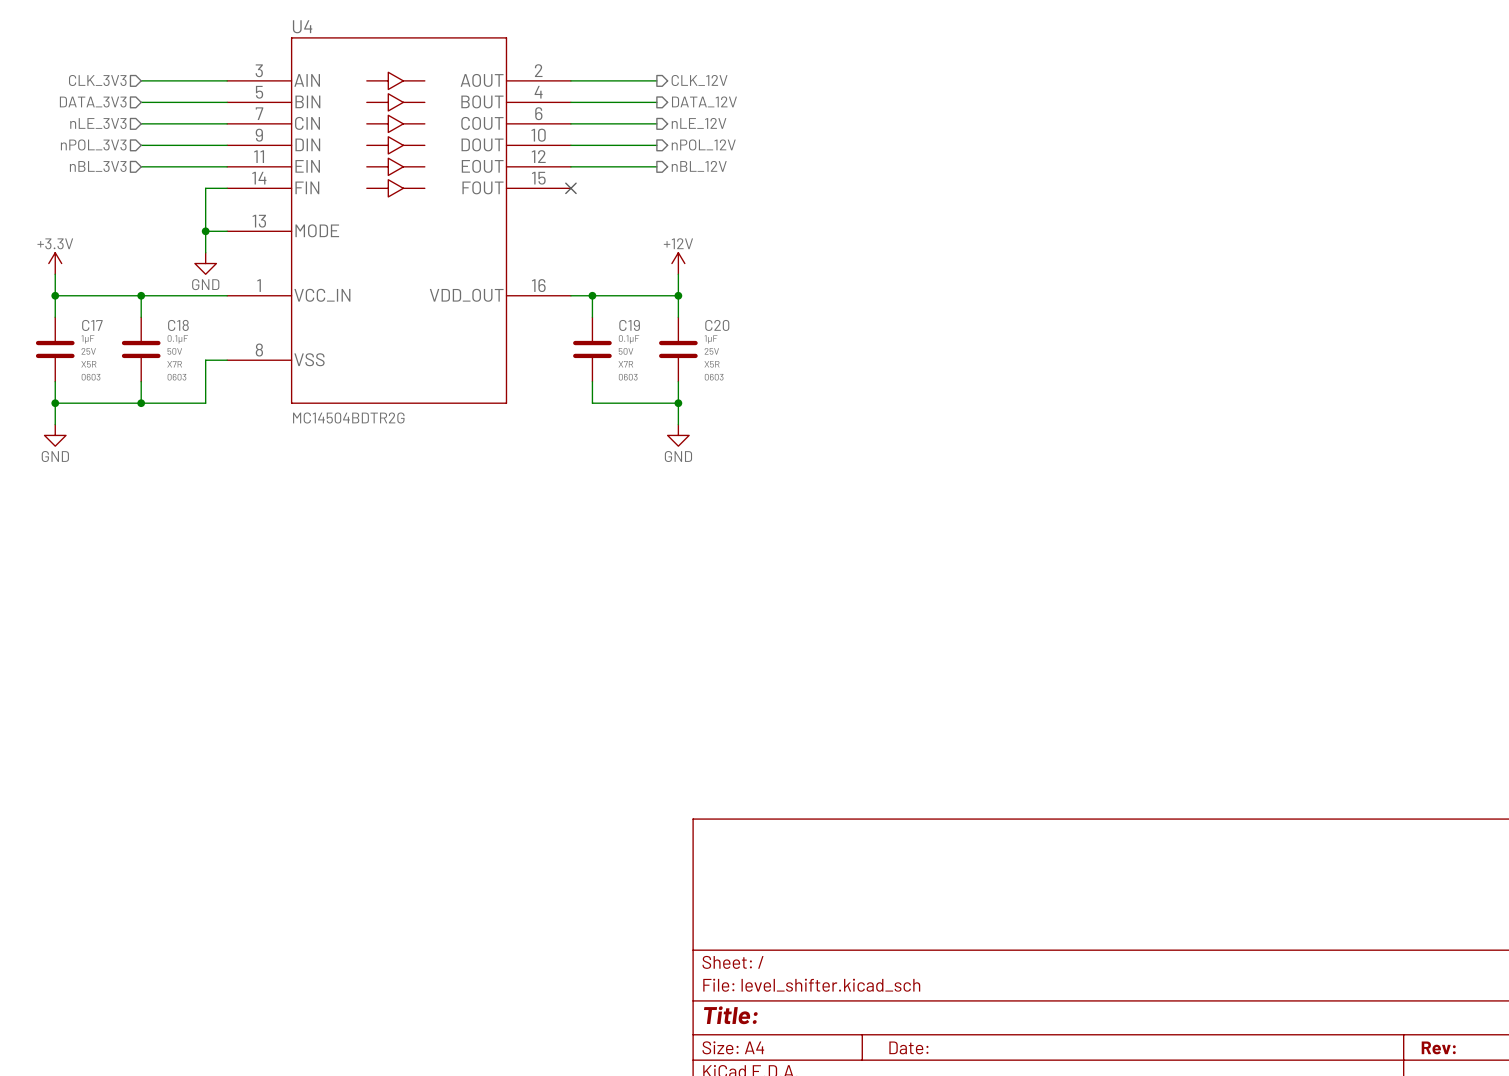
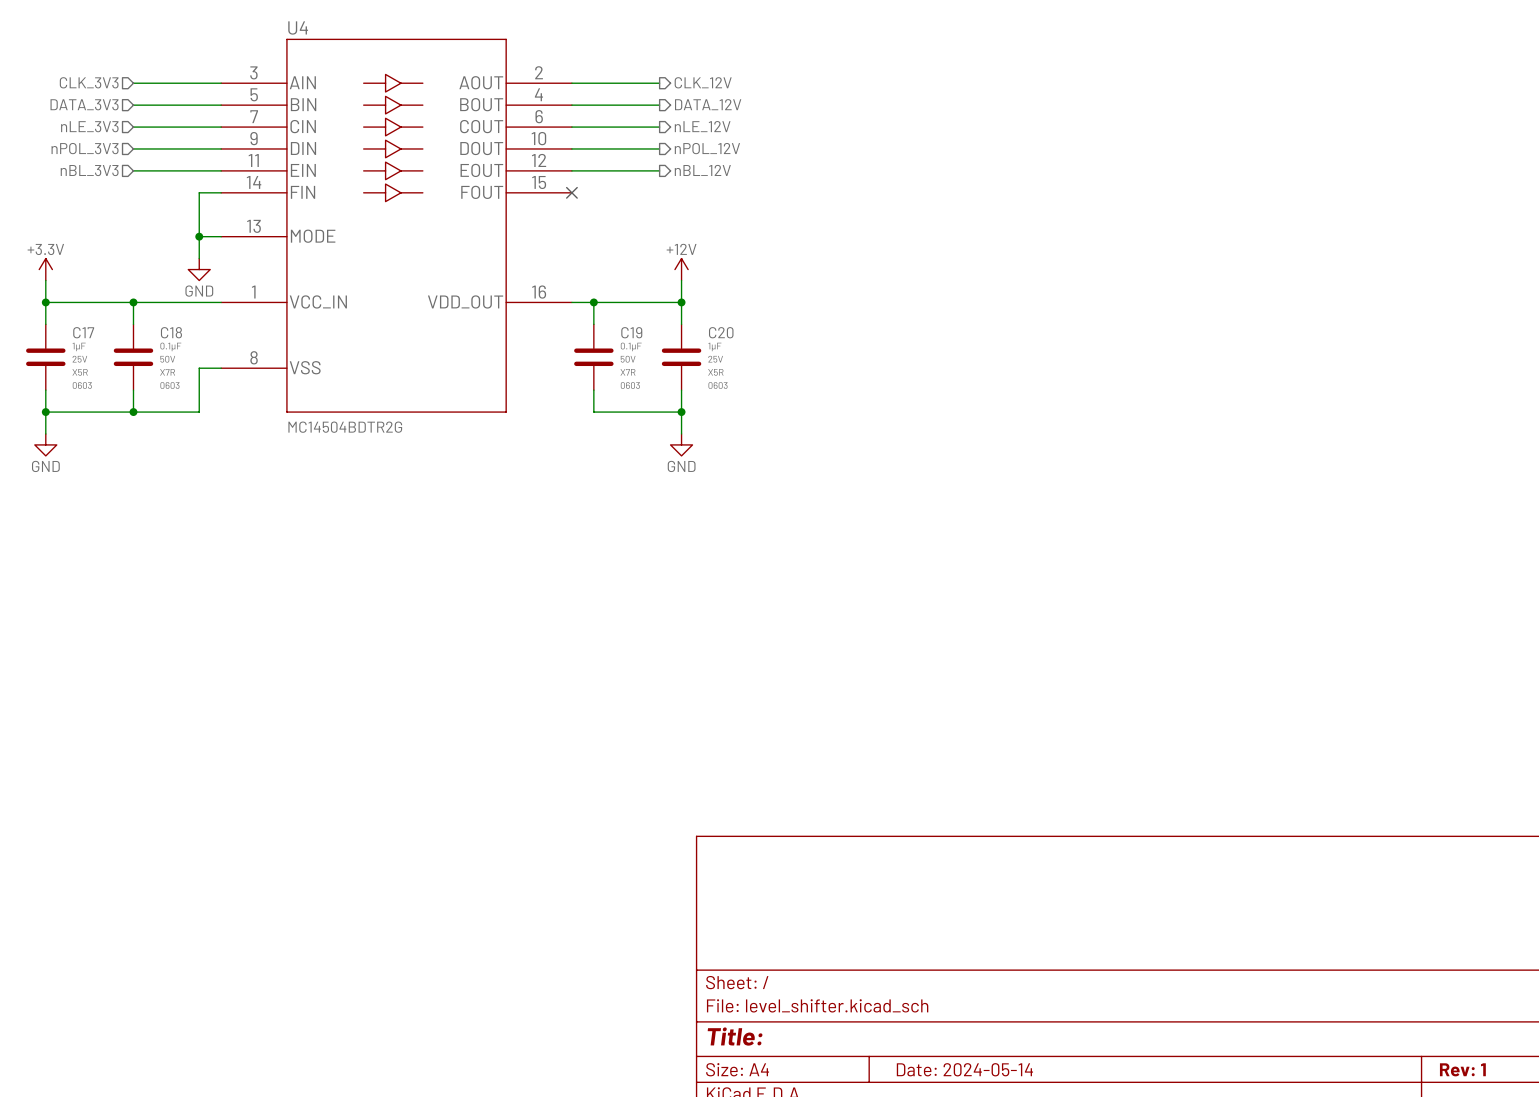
title block: Date: (908, 1047) -> Date: 2024-05-14 (964, 1069)
title block: Rev: (1438, 1047) -> Rev: 1 (1462, 1069)

